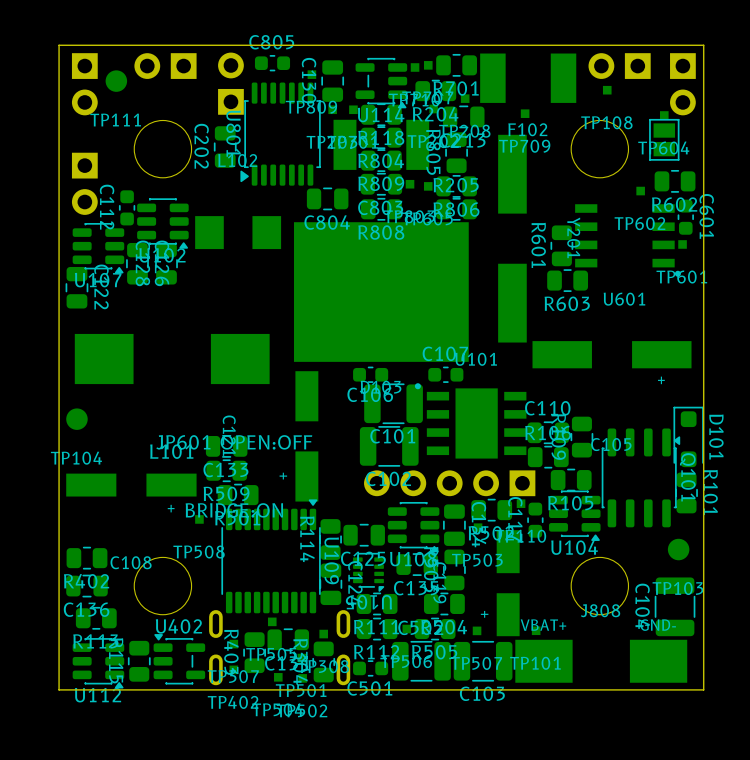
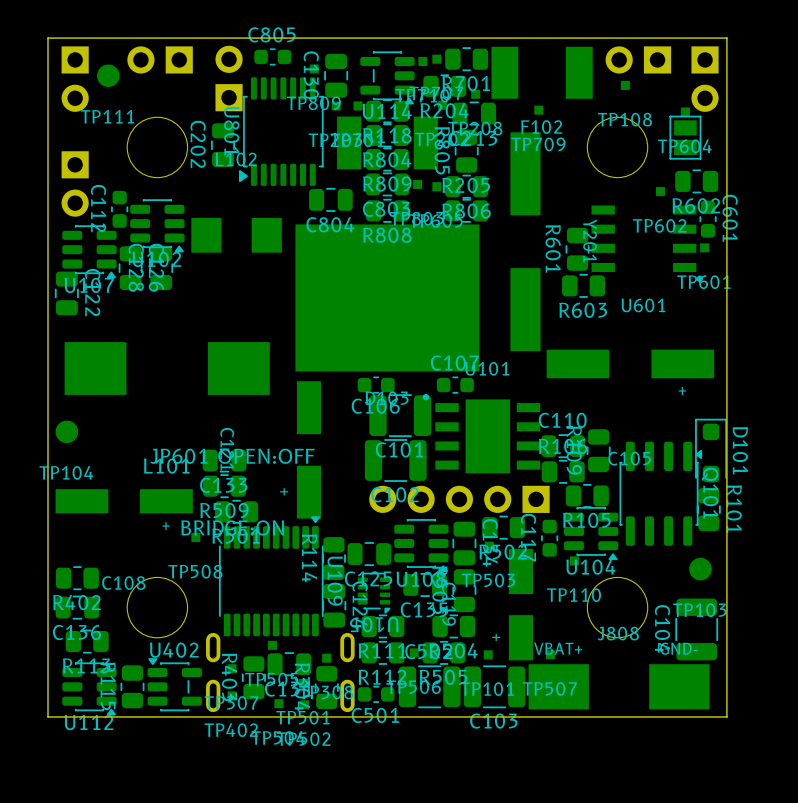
TP110 position: (521, 503) -> (574, 560)
TP507 name: TP507 (476, 663) -> TP101 (487, 689)
TP101 name: TP101 (535, 663) -> TP507 (549, 688)

